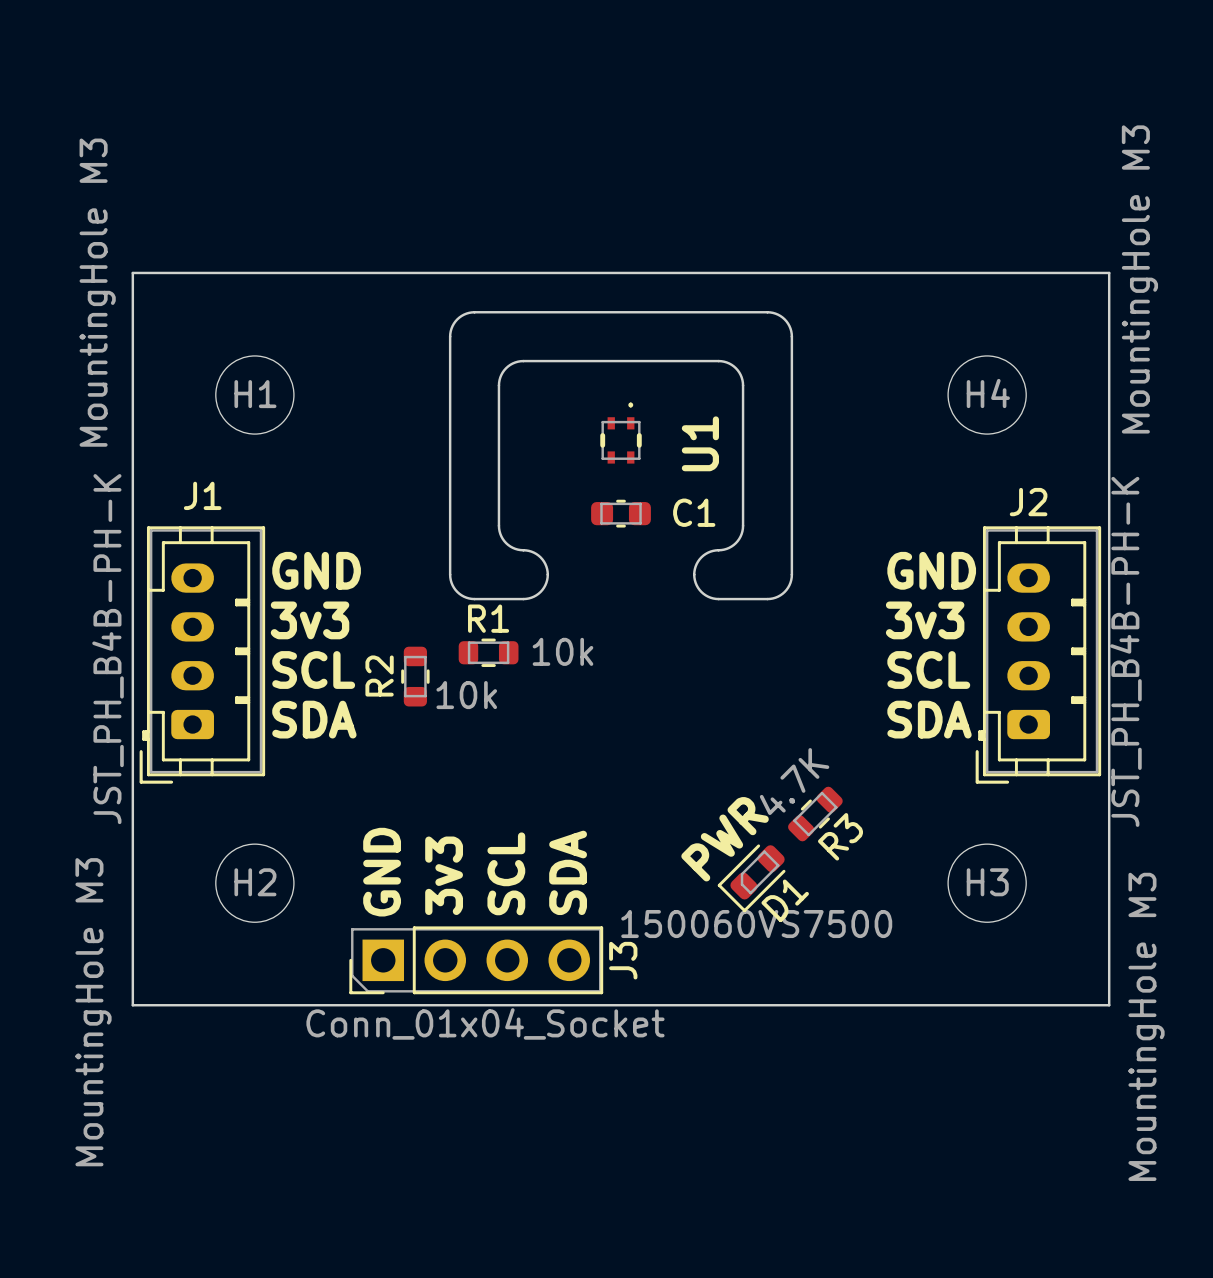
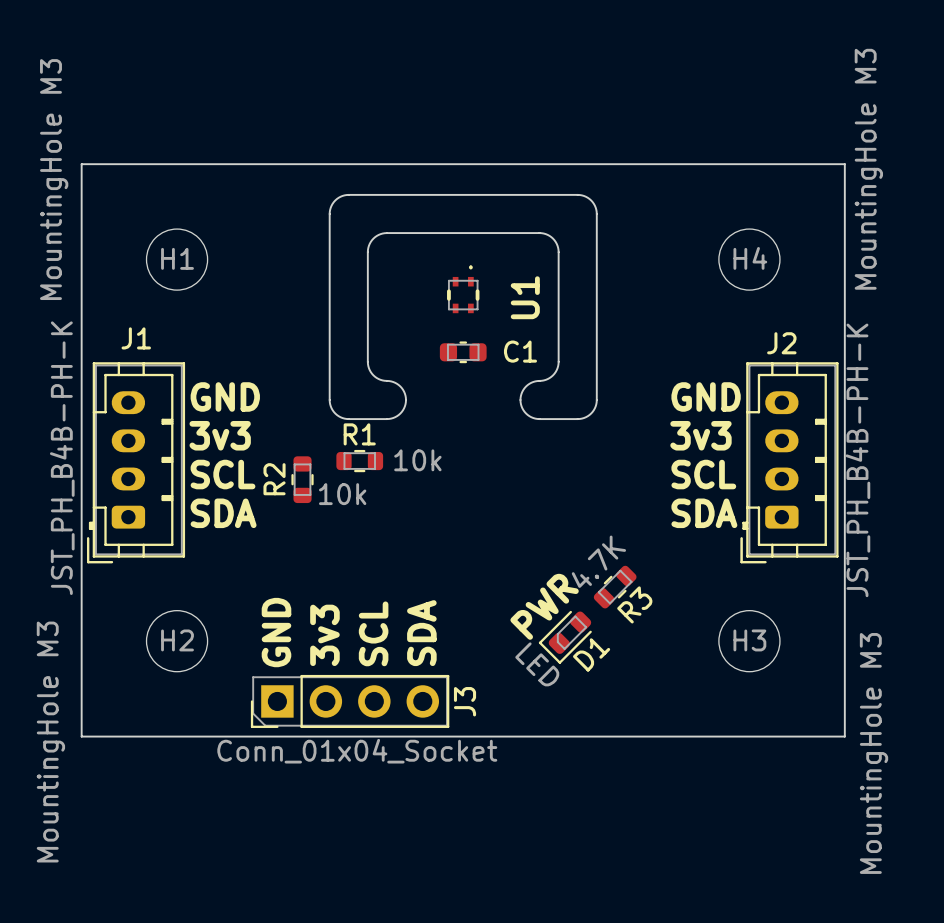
D1 value: 150060VS7500 (756, 924) -> LED (537, 664)

